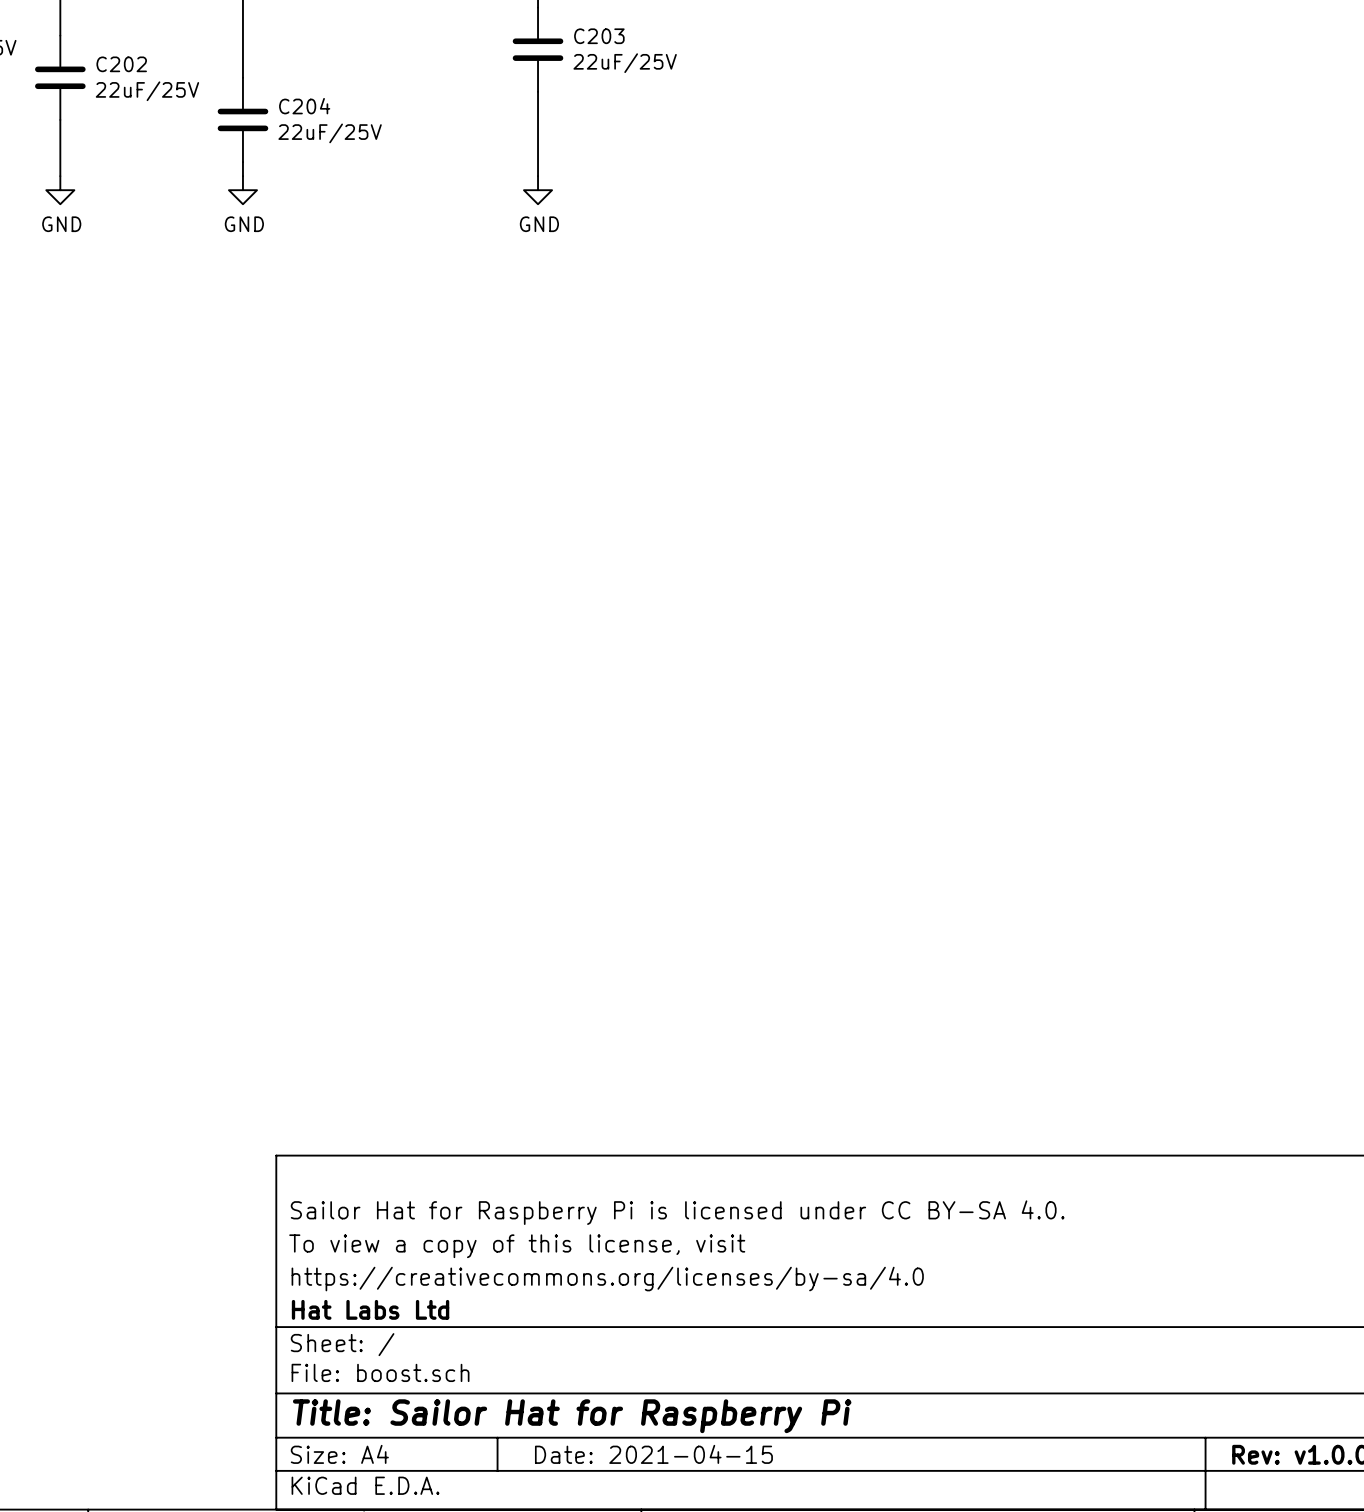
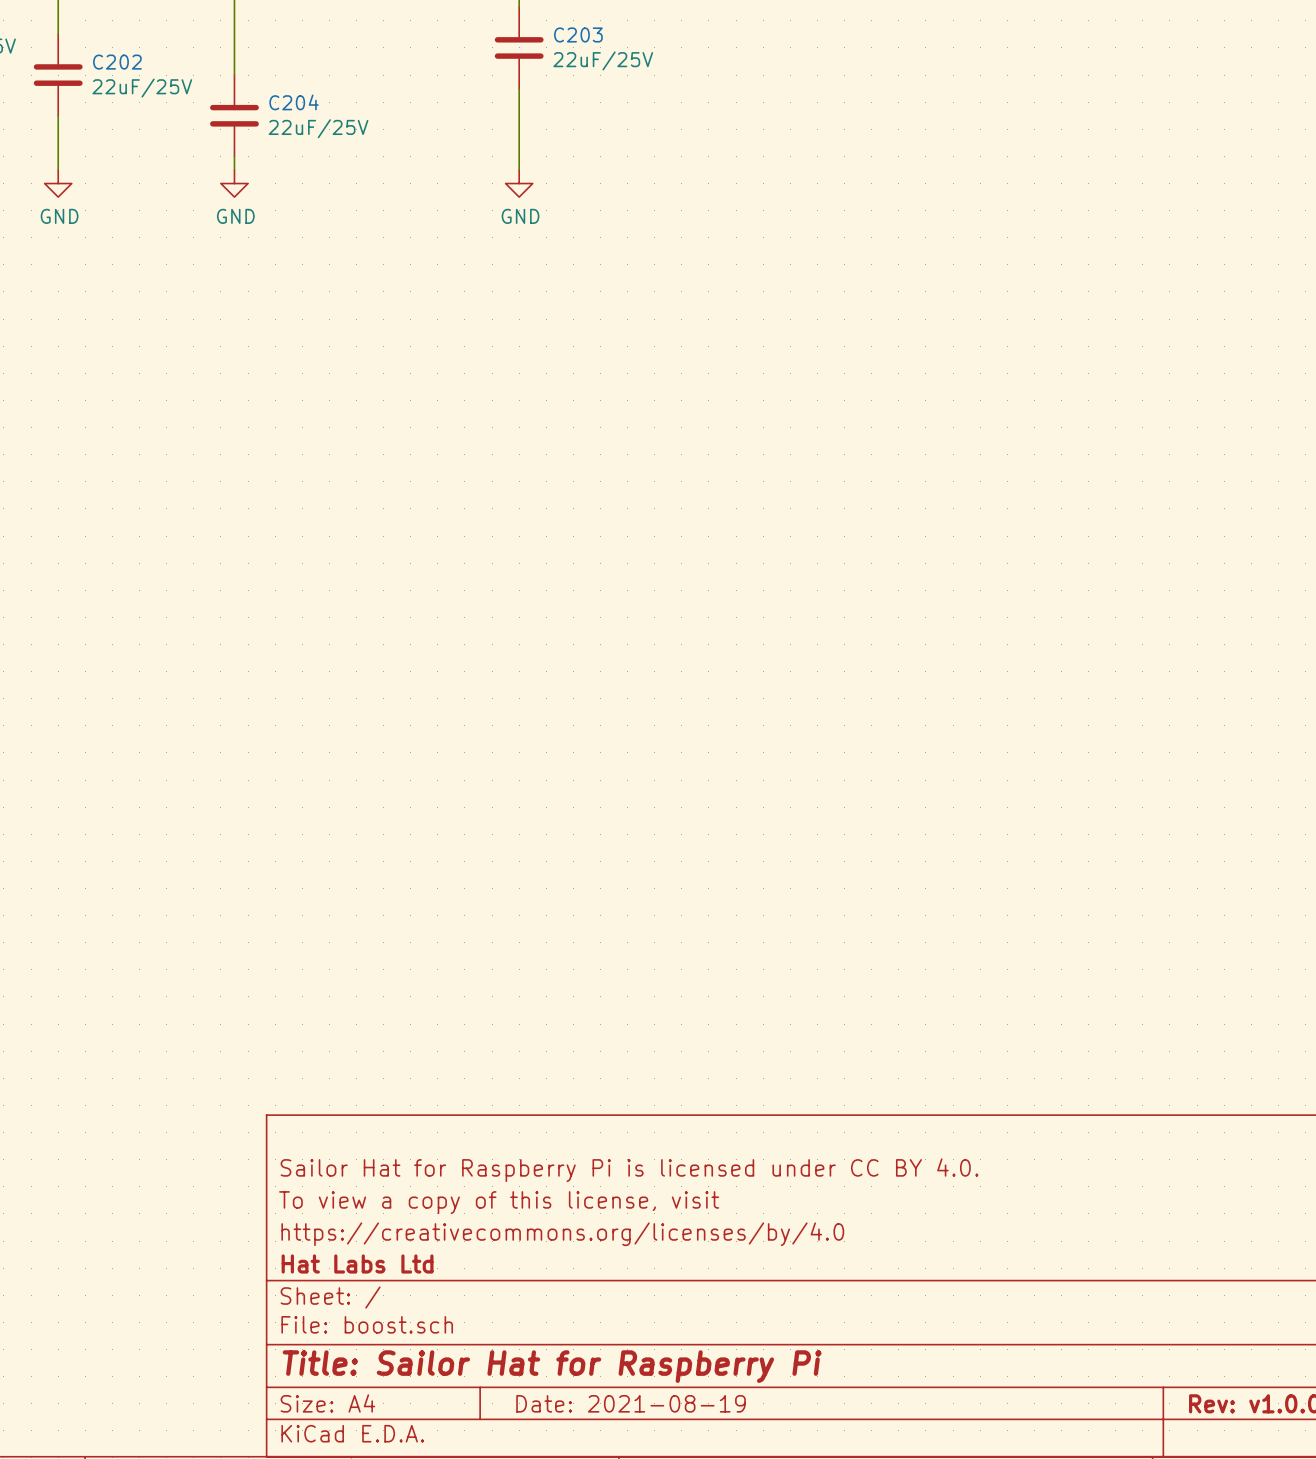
title block: Sailor Hat for Raspberry Pi is licensed under CC BY-SA 4.0. (677, 1212) -> Sailor Hat for Raspberry Pi is licensed under CC BY 4.0. (629, 1170)
title block: https://creativecommons.org/licenses/by-sa/4.0 (607, 1279) -> https://creativecommons.org/licenses/by/4.0 (562, 1234)
title block: Date: 2021-04-15 (653, 1454) -> Date: 2021-08-19 (631, 1403)

